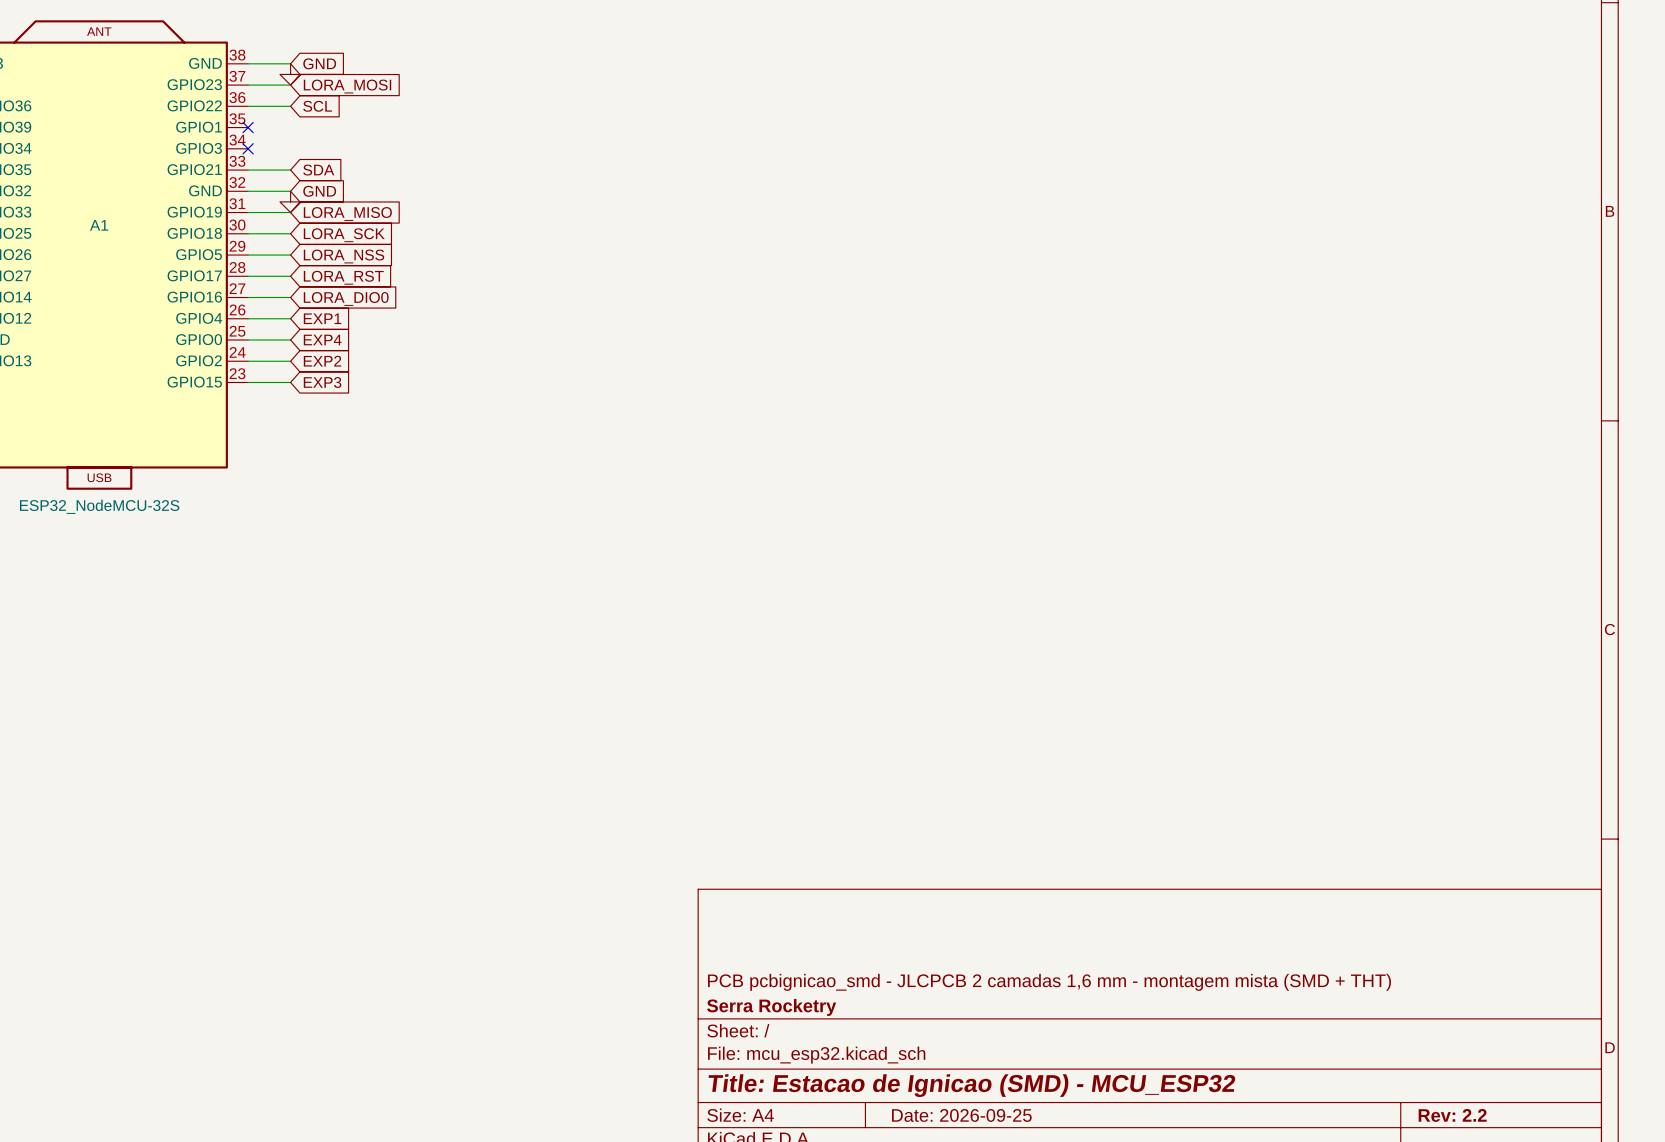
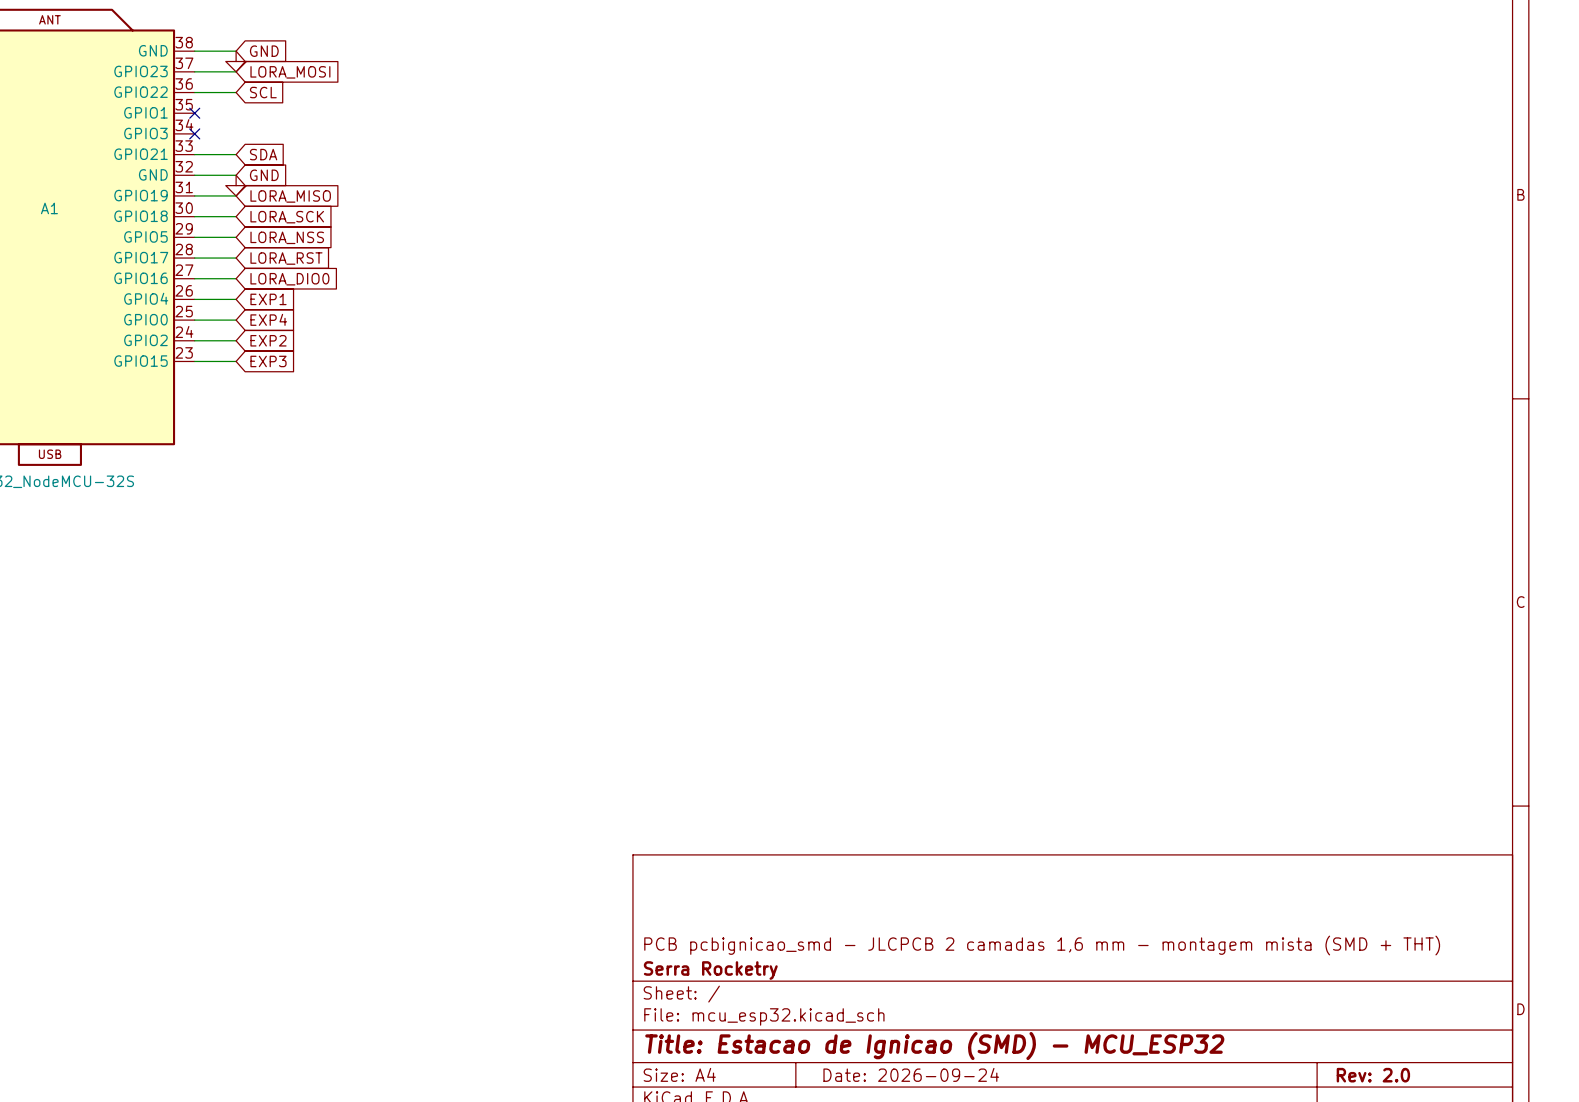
title block: Date: 2026-09-25 (961, 1115) -> Date: 2026-09-24 (911, 1074)
title block: Rev: 2.2 (1452, 1115) -> Rev: 2.0 (1373, 1075)

